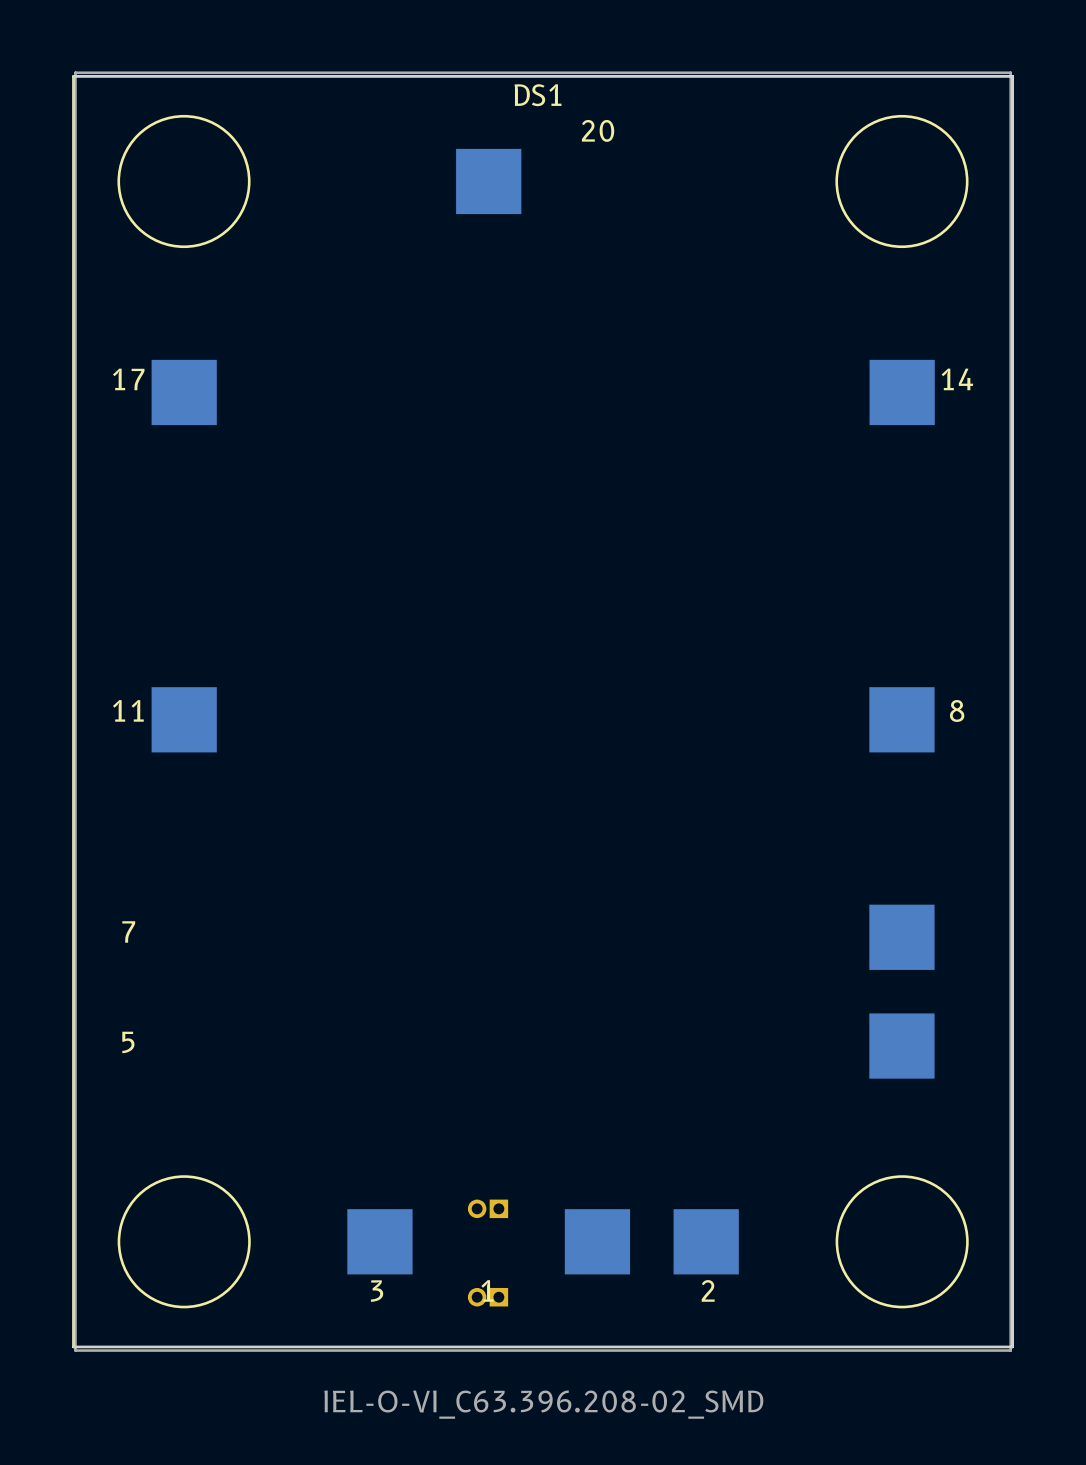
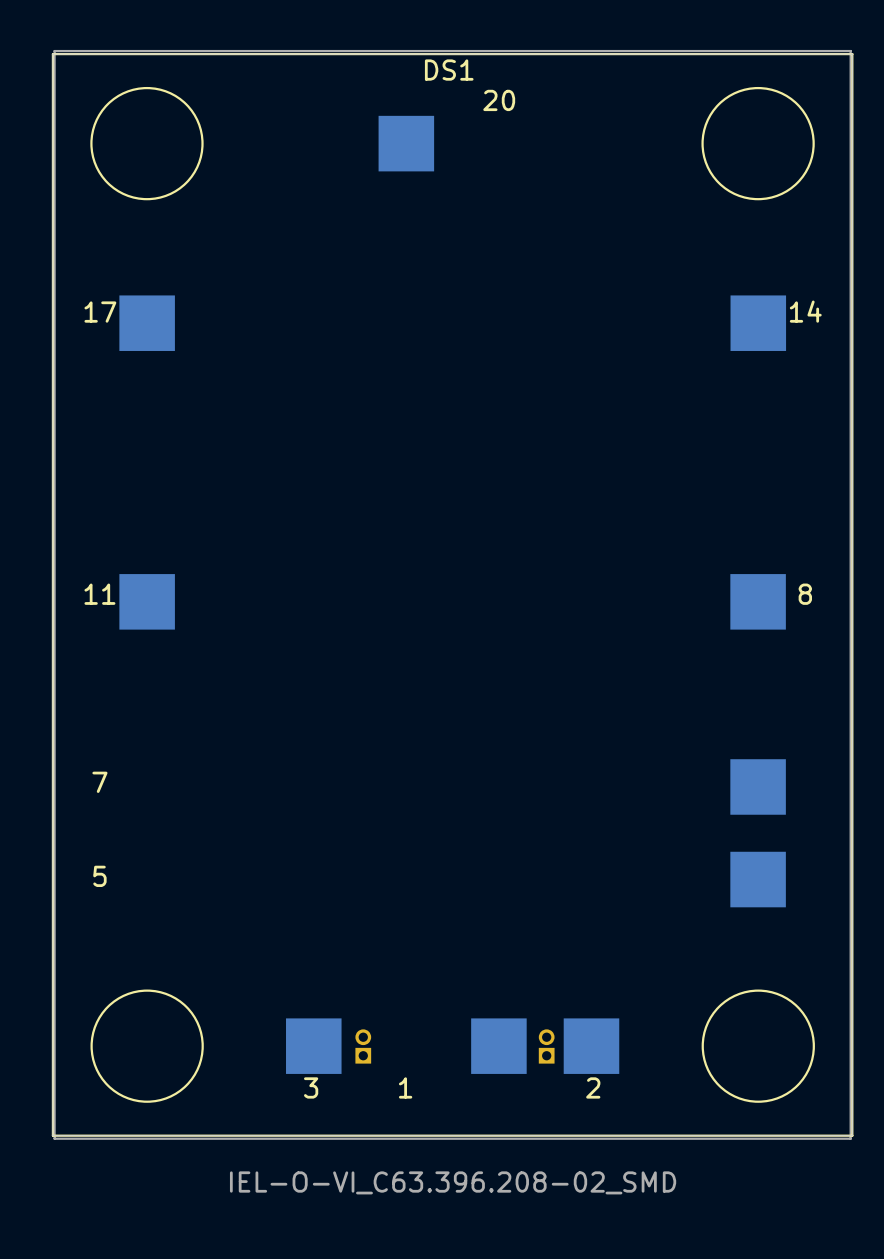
part: (488, 1208) -> none
part: none -> (363, 1046)
part: none -> (546, 1046)
part: (488, 1297) -> none

